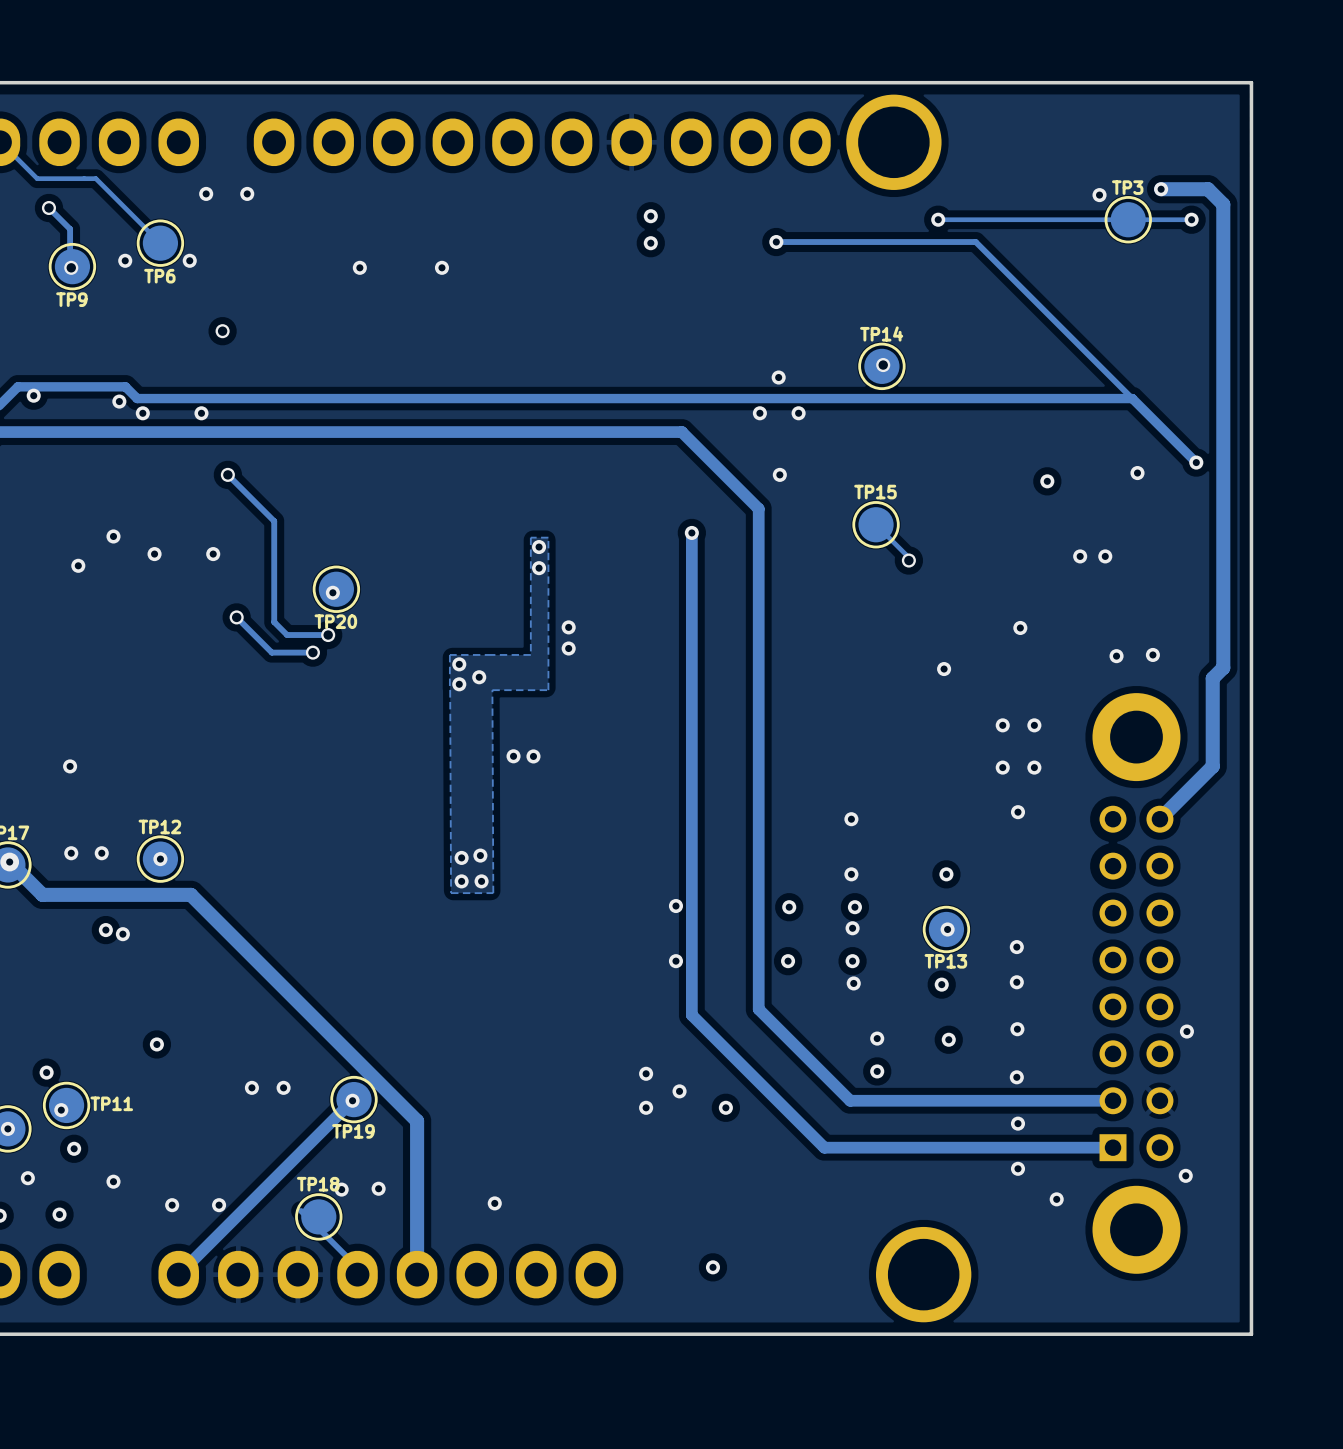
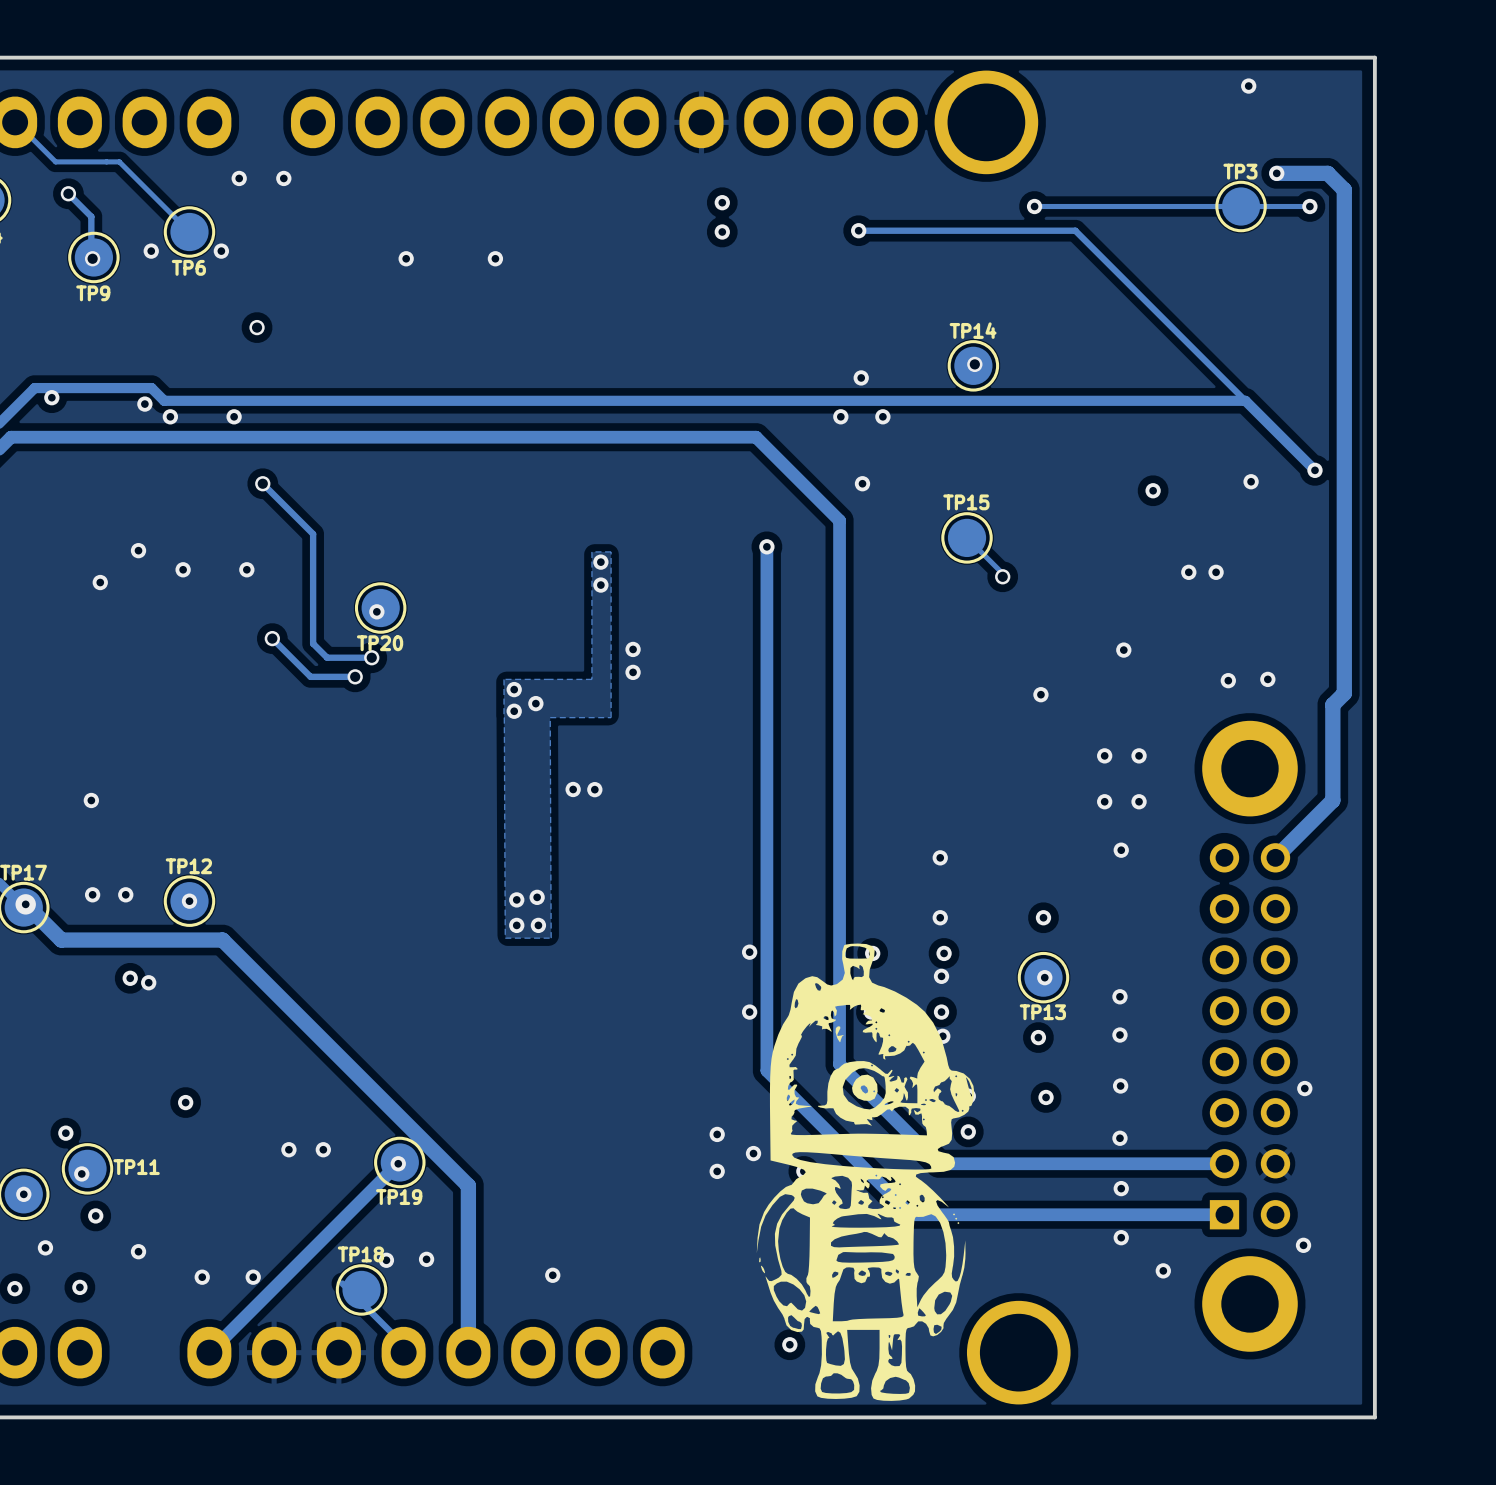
via position: (1099, 195) -> (1248, 86)
drawing: none -> [756, 943, 974, 1401]

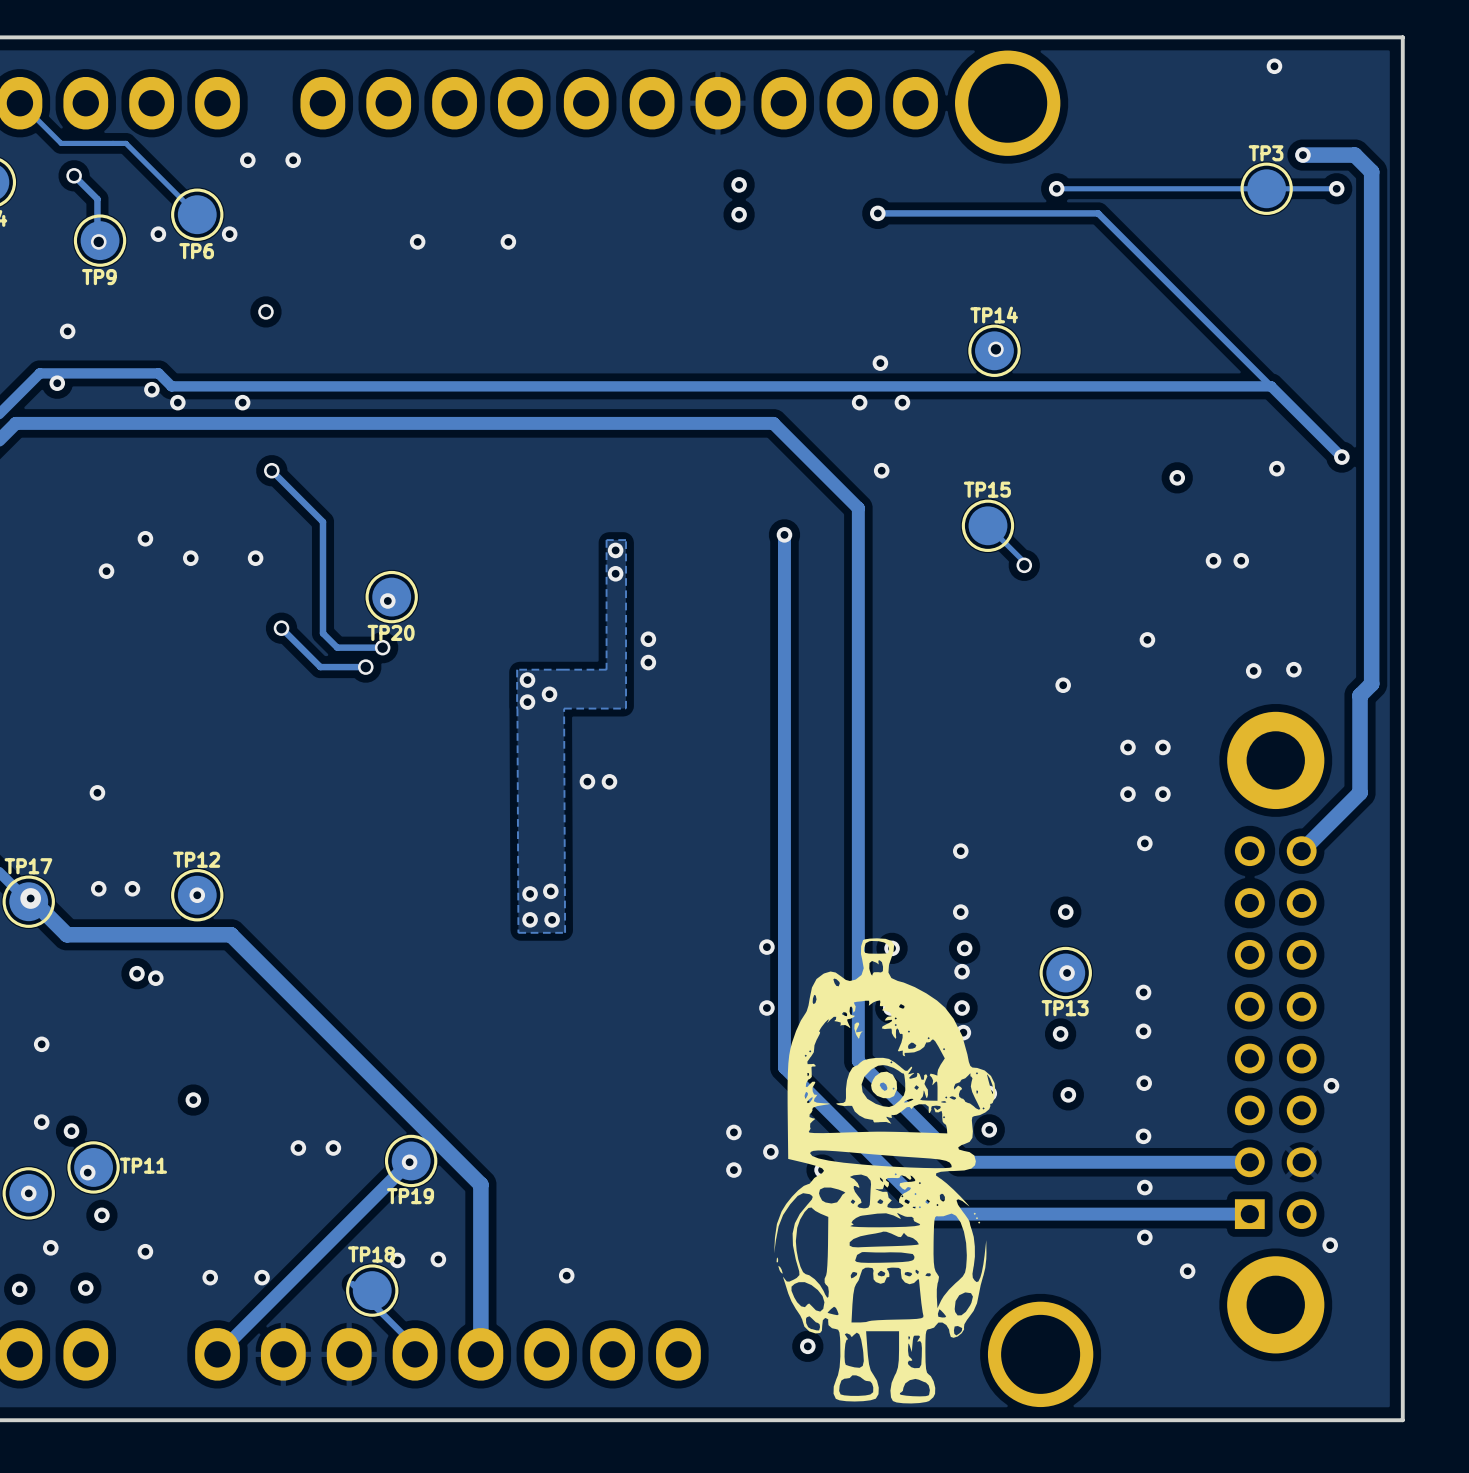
via: none -> (67, 331)
via: none -> (41, 1044)
via: none -> (41, 1122)

